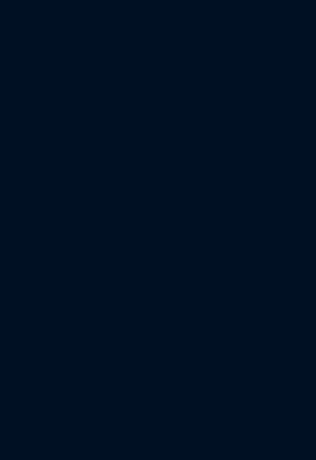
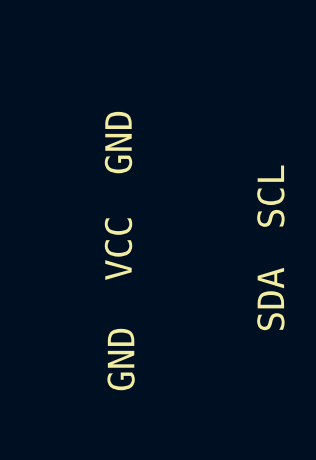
text: none -> GND (118, 142)
text: none -> SCL (270, 196)
text: none -> VCC (118, 249)
text: none -> SDA (270, 298)
text: none -> GND (121, 359)

